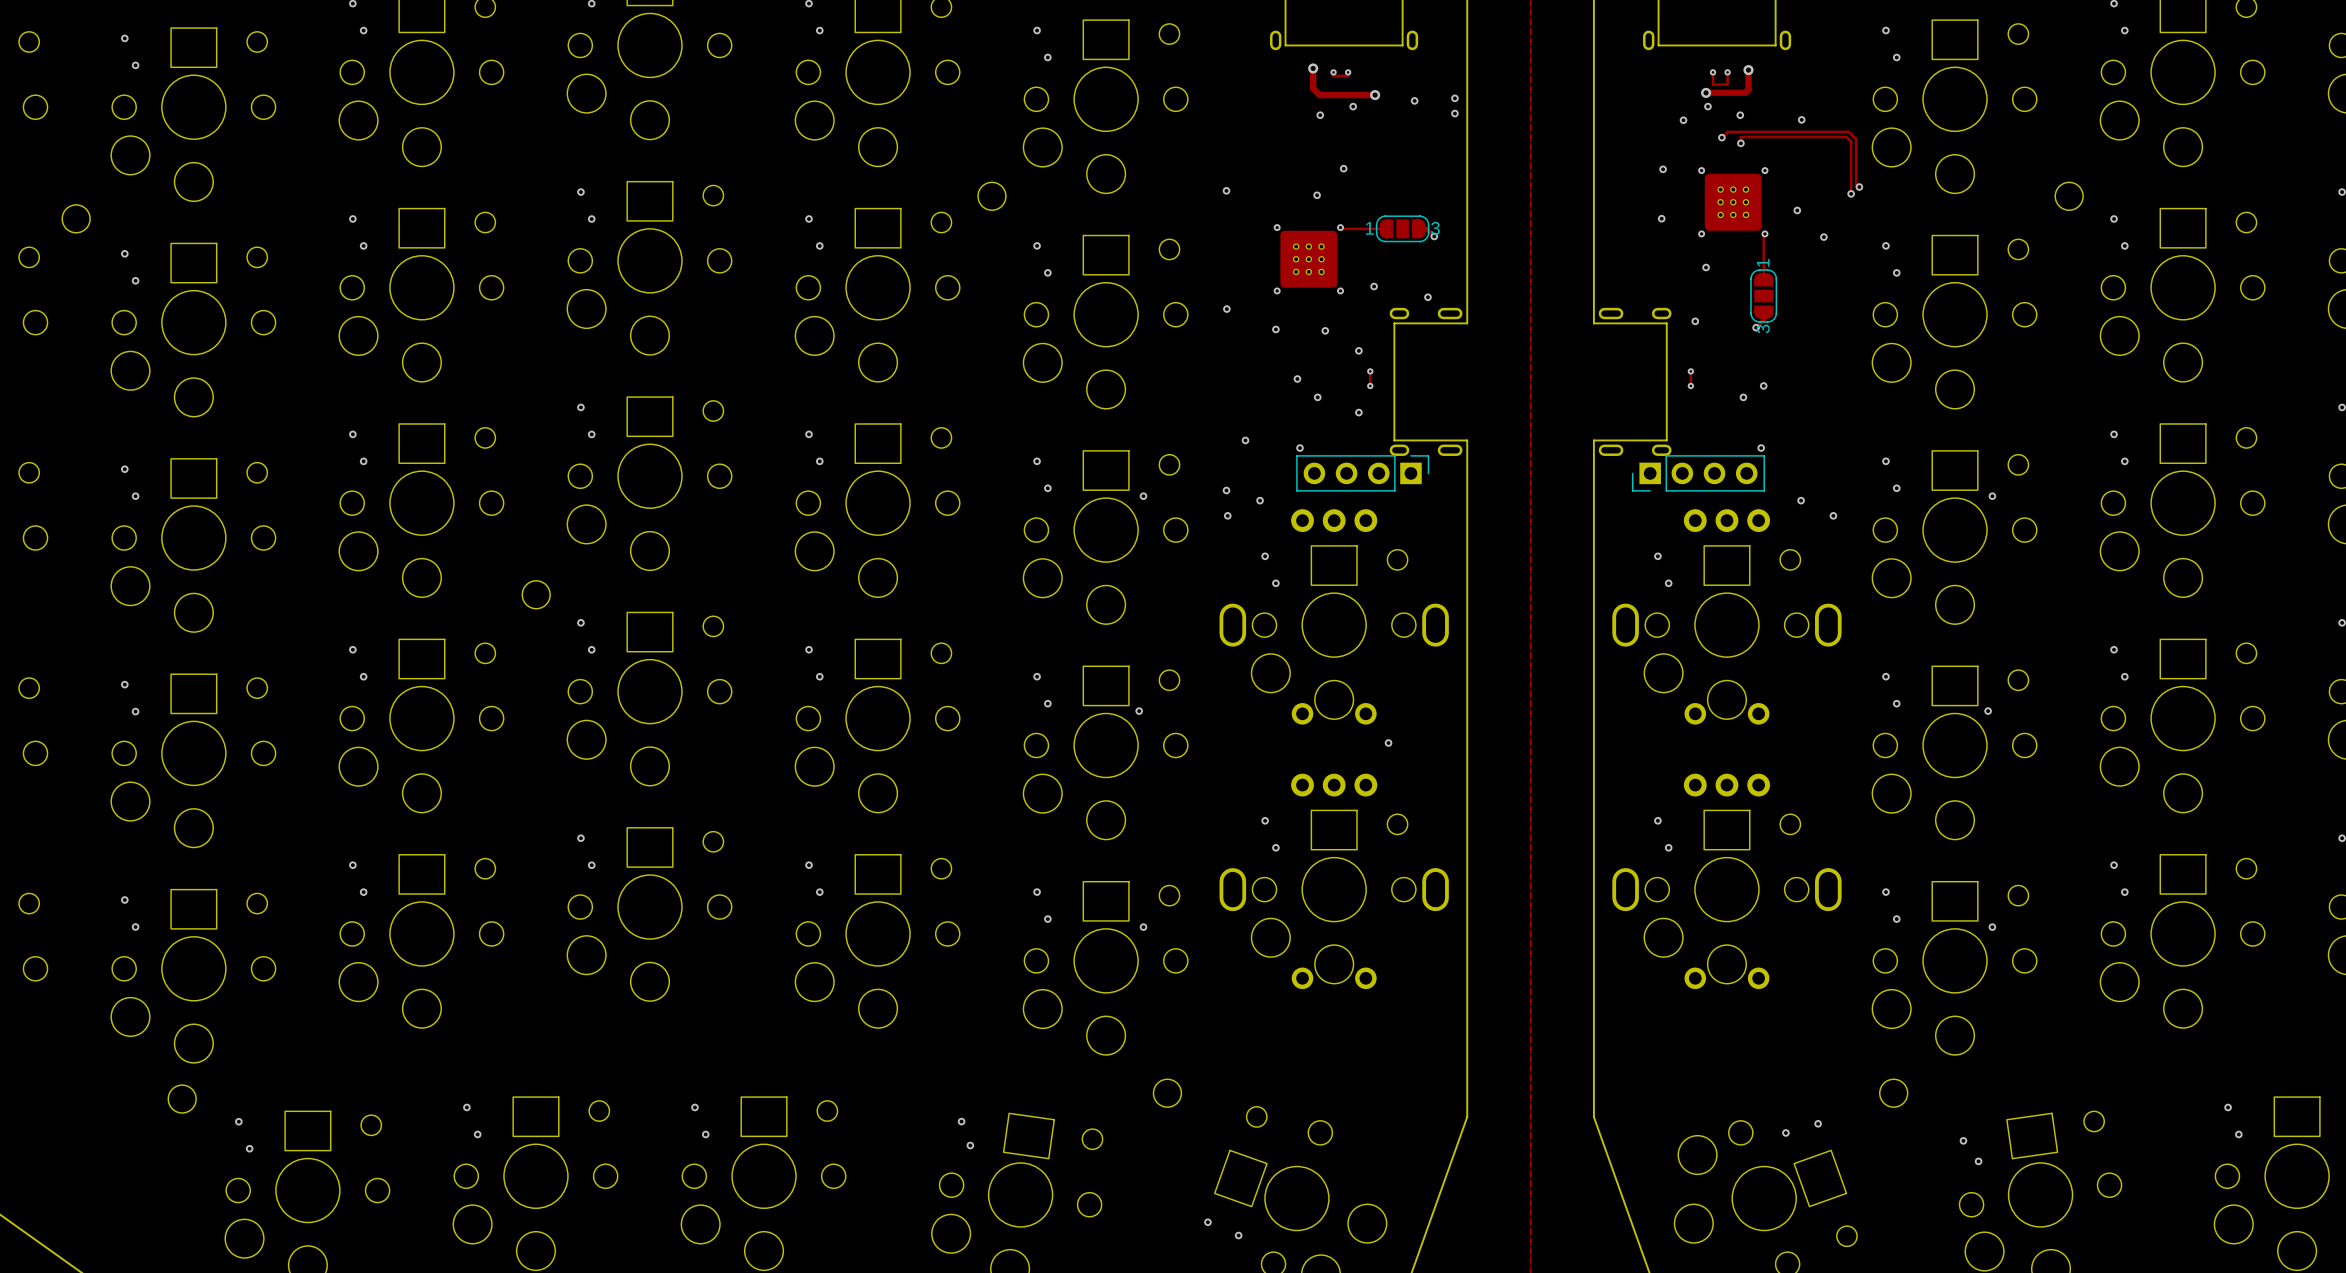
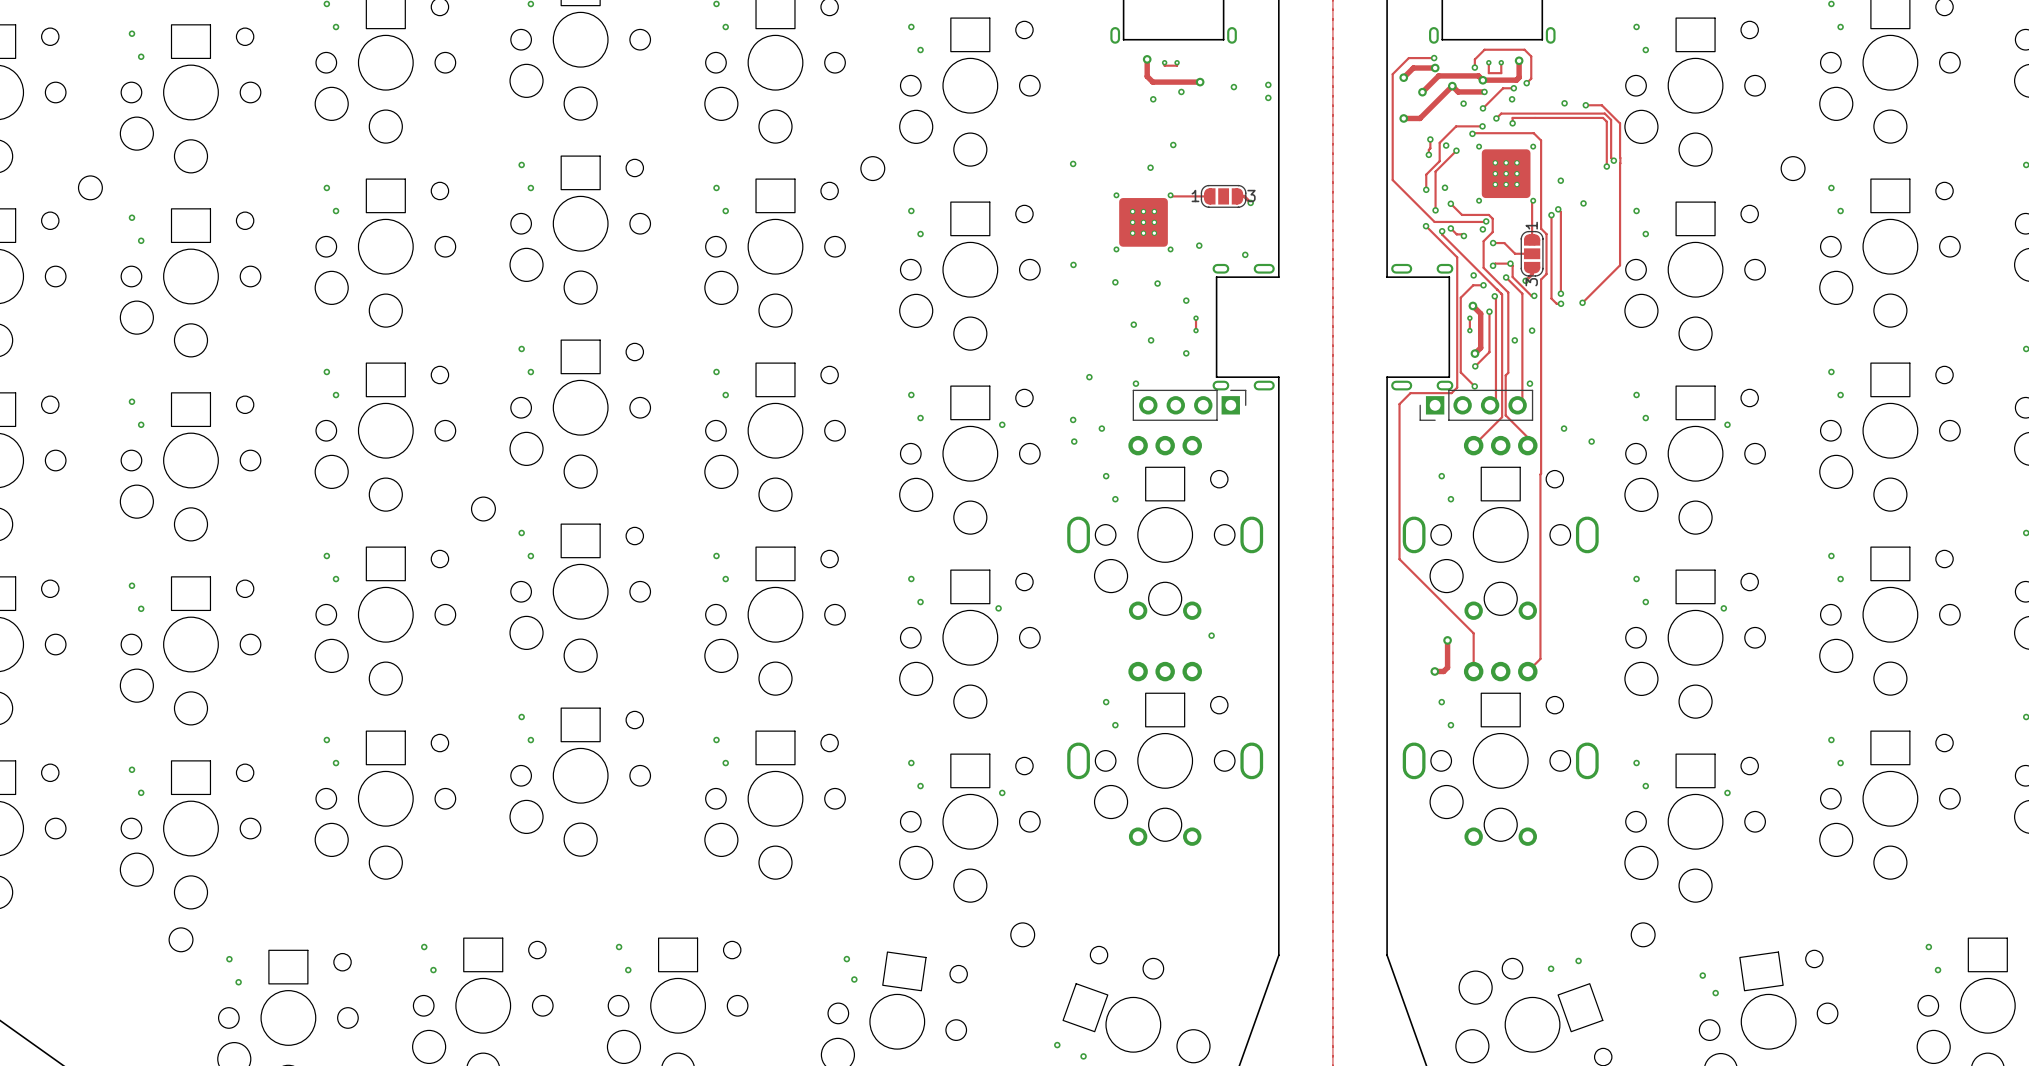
track: none -> (1434, 58) (1408, 58) (1392, 74) (1392, 180) (1434, 221) (1486, 221)
via: none -> (1434, 58)
track: none -> (1435, 68) (1413, 68) (1403, 77)
via: none -> (1435, 68)
track: none -> (1474, 67) (1474, 59) (1484, 49) (1524, 49) (1531, 56) (1531, 78) (1526, 83)
via: none -> (1474, 67)
via: none -> (1403, 77)
track: none -> (1482, 80) (1478, 75) (1438, 75) (1422, 92)
via: none -> (1526, 83)
via: none -> (1452, 86)
track: none -> (1513, 88) (1503, 88) (1482, 108)
via: none -> (1513, 88)
via: none -> (1422, 92)
track: none -> (1484, 91) (1458, 91) (1452, 86) (1419, 118) (1403, 118)
track: none -> (1585, 105) (1601, 105) (1620, 123) (1620, 265) (1582, 302)
via: none -> (1585, 105)
via: none -> (1482, 108)
via: none -> (1403, 118)
track: none -> (1482, 126) (1456, 126) (1439, 142) (1439, 161) (1426, 174) (1426, 189)
via: none -> (1482, 126)
track: none -> (1472, 133) (1533, 133) (1541, 140) (1541, 228) (1546, 234) (1546, 274) (1541, 279) (1540, 658) (1527, 671)
via: none -> (1472, 133)
track: none -> (1430, 139) (1428, 154)
via: none -> (1430, 139)
track: none -> (1456, 150) (1435, 171) (1435, 210)
via: none -> (1456, 150)
via: none -> (1428, 154)
via: none -> (1426, 189)
track: none -> (1450, 203) (1462, 214) (1488, 214) (1492, 218) (1492, 232) (1483, 241) (1483, 267) (1508, 292) (1508, 372) (1505, 375) (1505, 415) (1527, 437) (1527, 445)
via: none -> (1450, 203)
track: none -> (1558, 209) (1560, 211) (1560, 293)
via: none -> (1558, 209)
via: none -> (1435, 210)
track: none -> (1551, 215) (1551, 298) (1556, 303) (1561, 303)
via: none -> (1551, 215)
via: none -> (1486, 221)
track: none -> (1426, 226) (1457, 257) (1457, 387) (1451, 393) (1410, 393) (1399, 404) (1399, 559) (1473, 633) (1473, 671)
via: none -> (1426, 226)
track: none -> (1450, 228) (1456, 234) (1463, 236)
via: none -> (1450, 228)
track: none -> (1442, 231) (1442, 234) (1497, 289)
via: none -> (1442, 231)
via: none -> (1463, 236)
track: none -> (1493, 243) (1504, 243) (1515, 253) (1532, 253)
via: none -> (1493, 243)
via: none -> (1510, 263)
track: none -> (1493, 265) (1495, 263) (1510, 263) (1512, 265) (1512, 277) (1531, 295) (1534, 295)
via: none -> (1493, 265)
track: none -> (1506, 277) (1522, 293) (1522, 400) (1517, 405)
via: none -> (1506, 277)
track: none -> (1483, 285) (1473, 285) (1460, 297) (1460, 372) (1474, 386)
via: none -> (1483, 285)
track: none -> (1497, 289) (1501, 293)
track: none -> (1501, 293) (1502, 417) (1473, 445)
via: none -> (1560, 293)
track: none -> (1494, 296) (1495, 399) (1490, 405)
via: none -> (1494, 296)
via: none -> (1534, 295)
via: none -> (1582, 302)
via: none -> (1561, 303)
track: none -> (1472, 305) (1480, 313) (1480, 347) (1474, 353)
via: none -> (1472, 305)
track: none -> (1489, 311) (1489, 352) (1475, 366)
via: none -> (1489, 311)
via: none -> (1474, 353)
via: none -> (1475, 366)
via: none -> (1474, 386)
track: none -> (1447, 640) (1447, 667) (1443, 671) (1434, 671)
via: none -> (1447, 640)
via: none -> (1434, 671)

